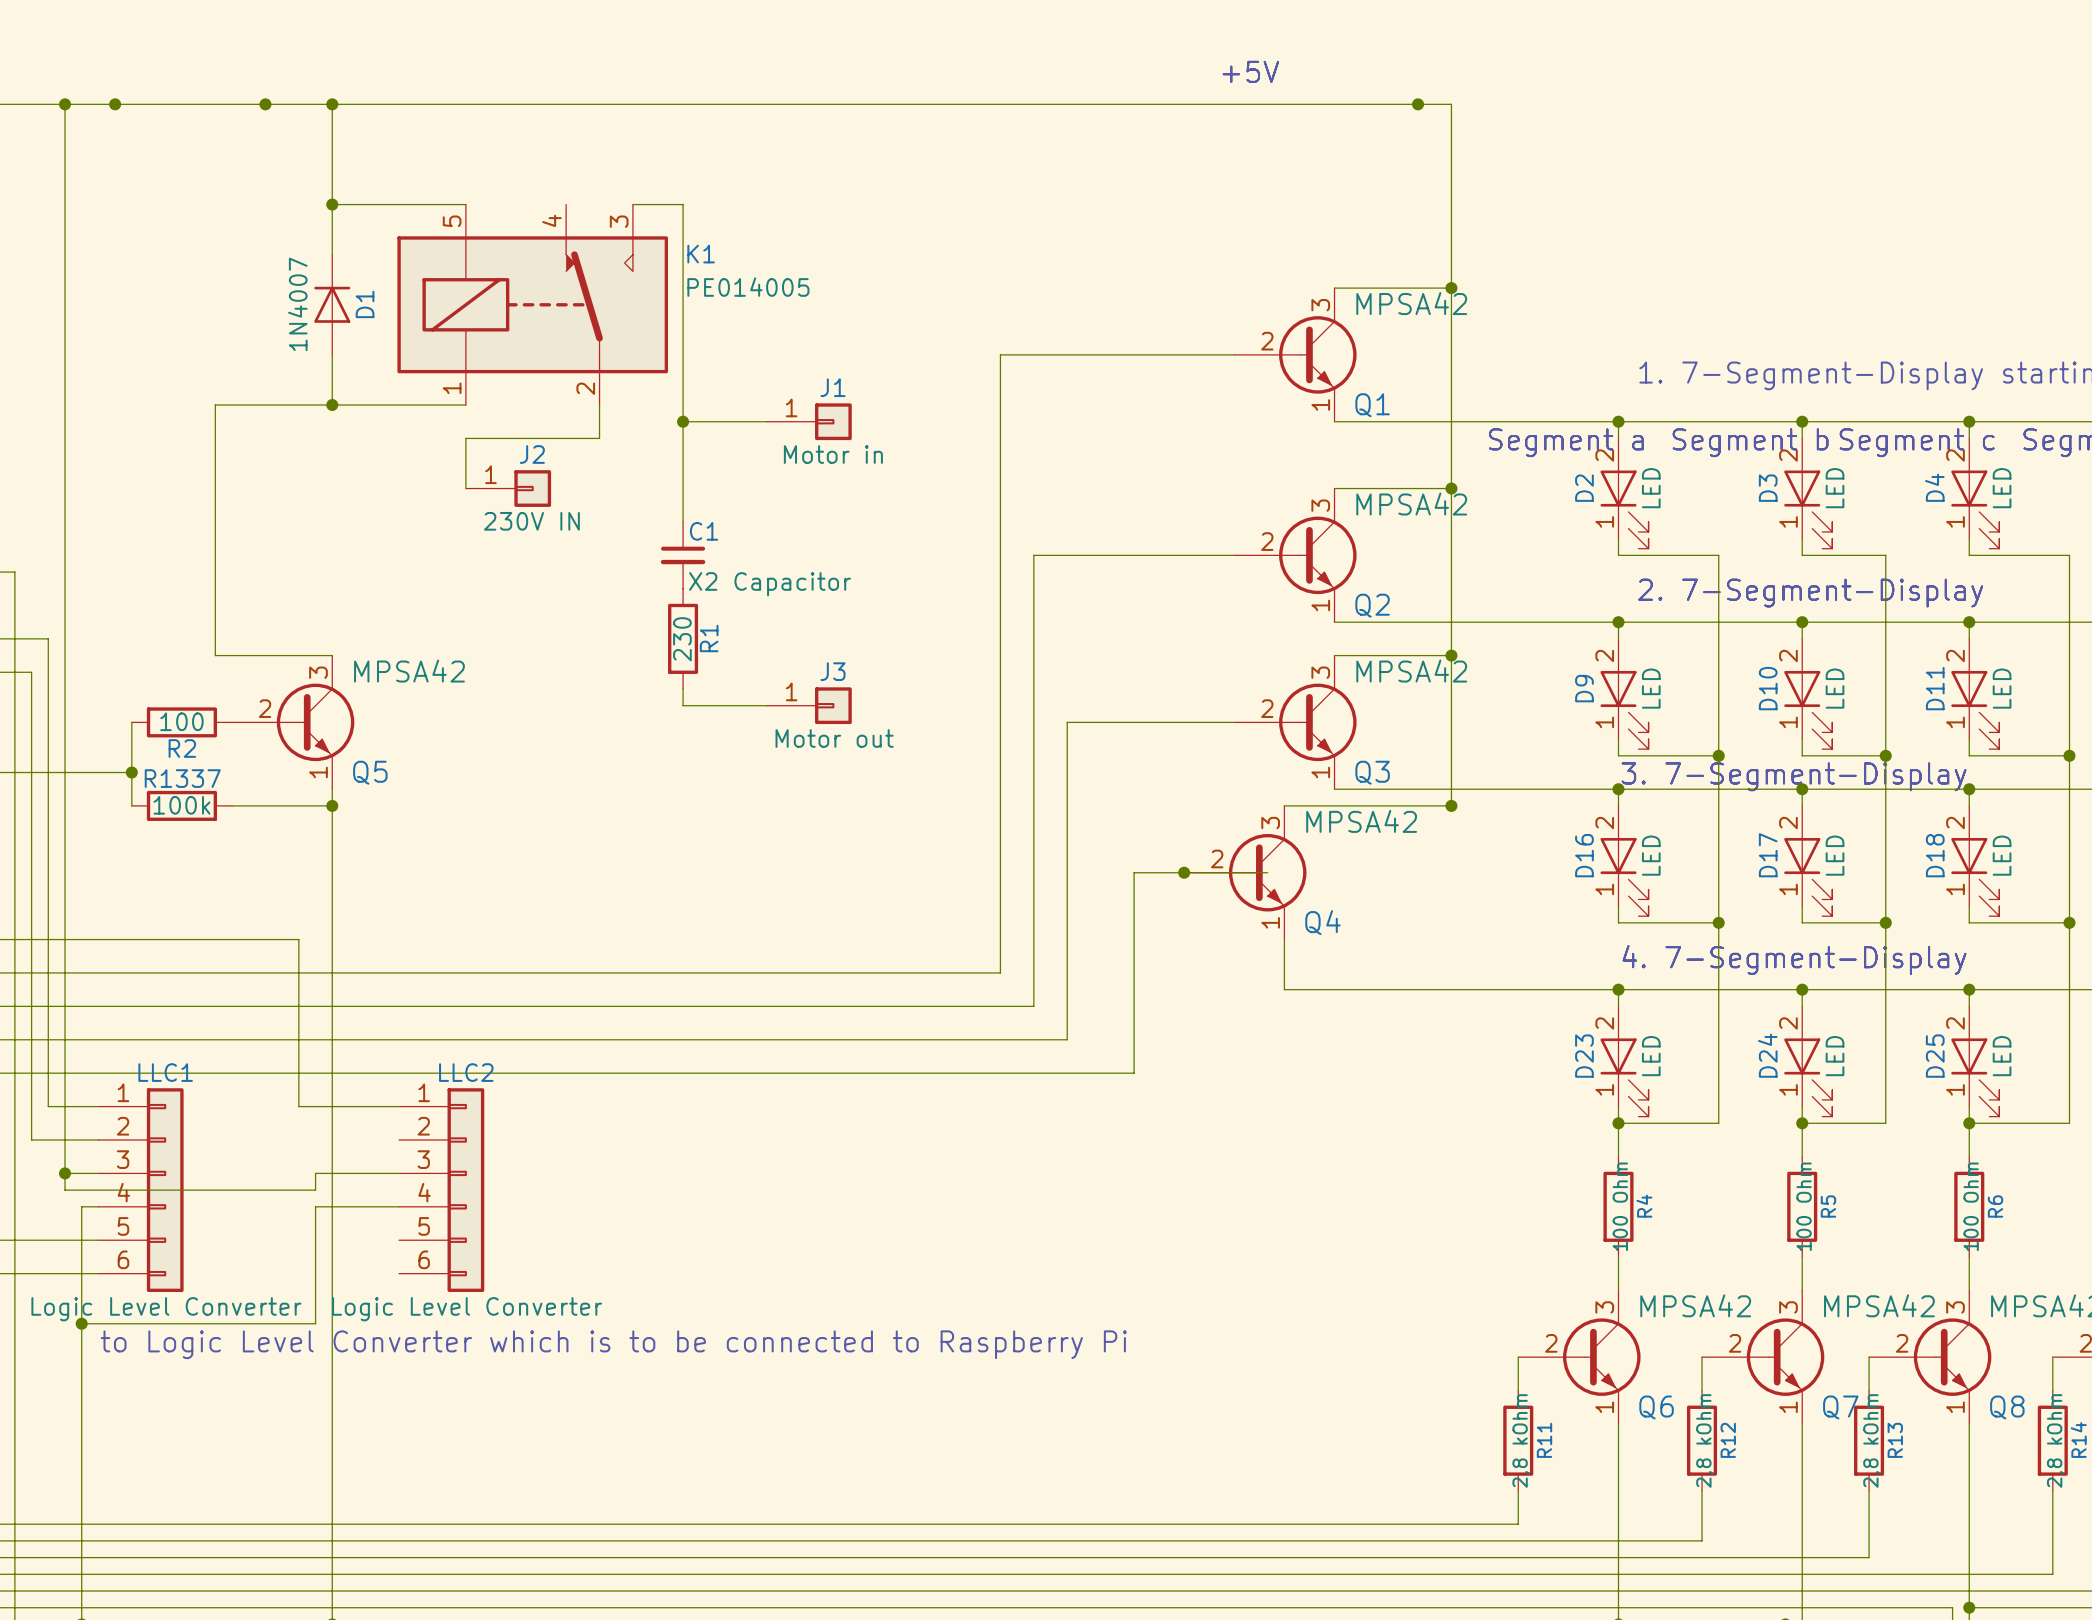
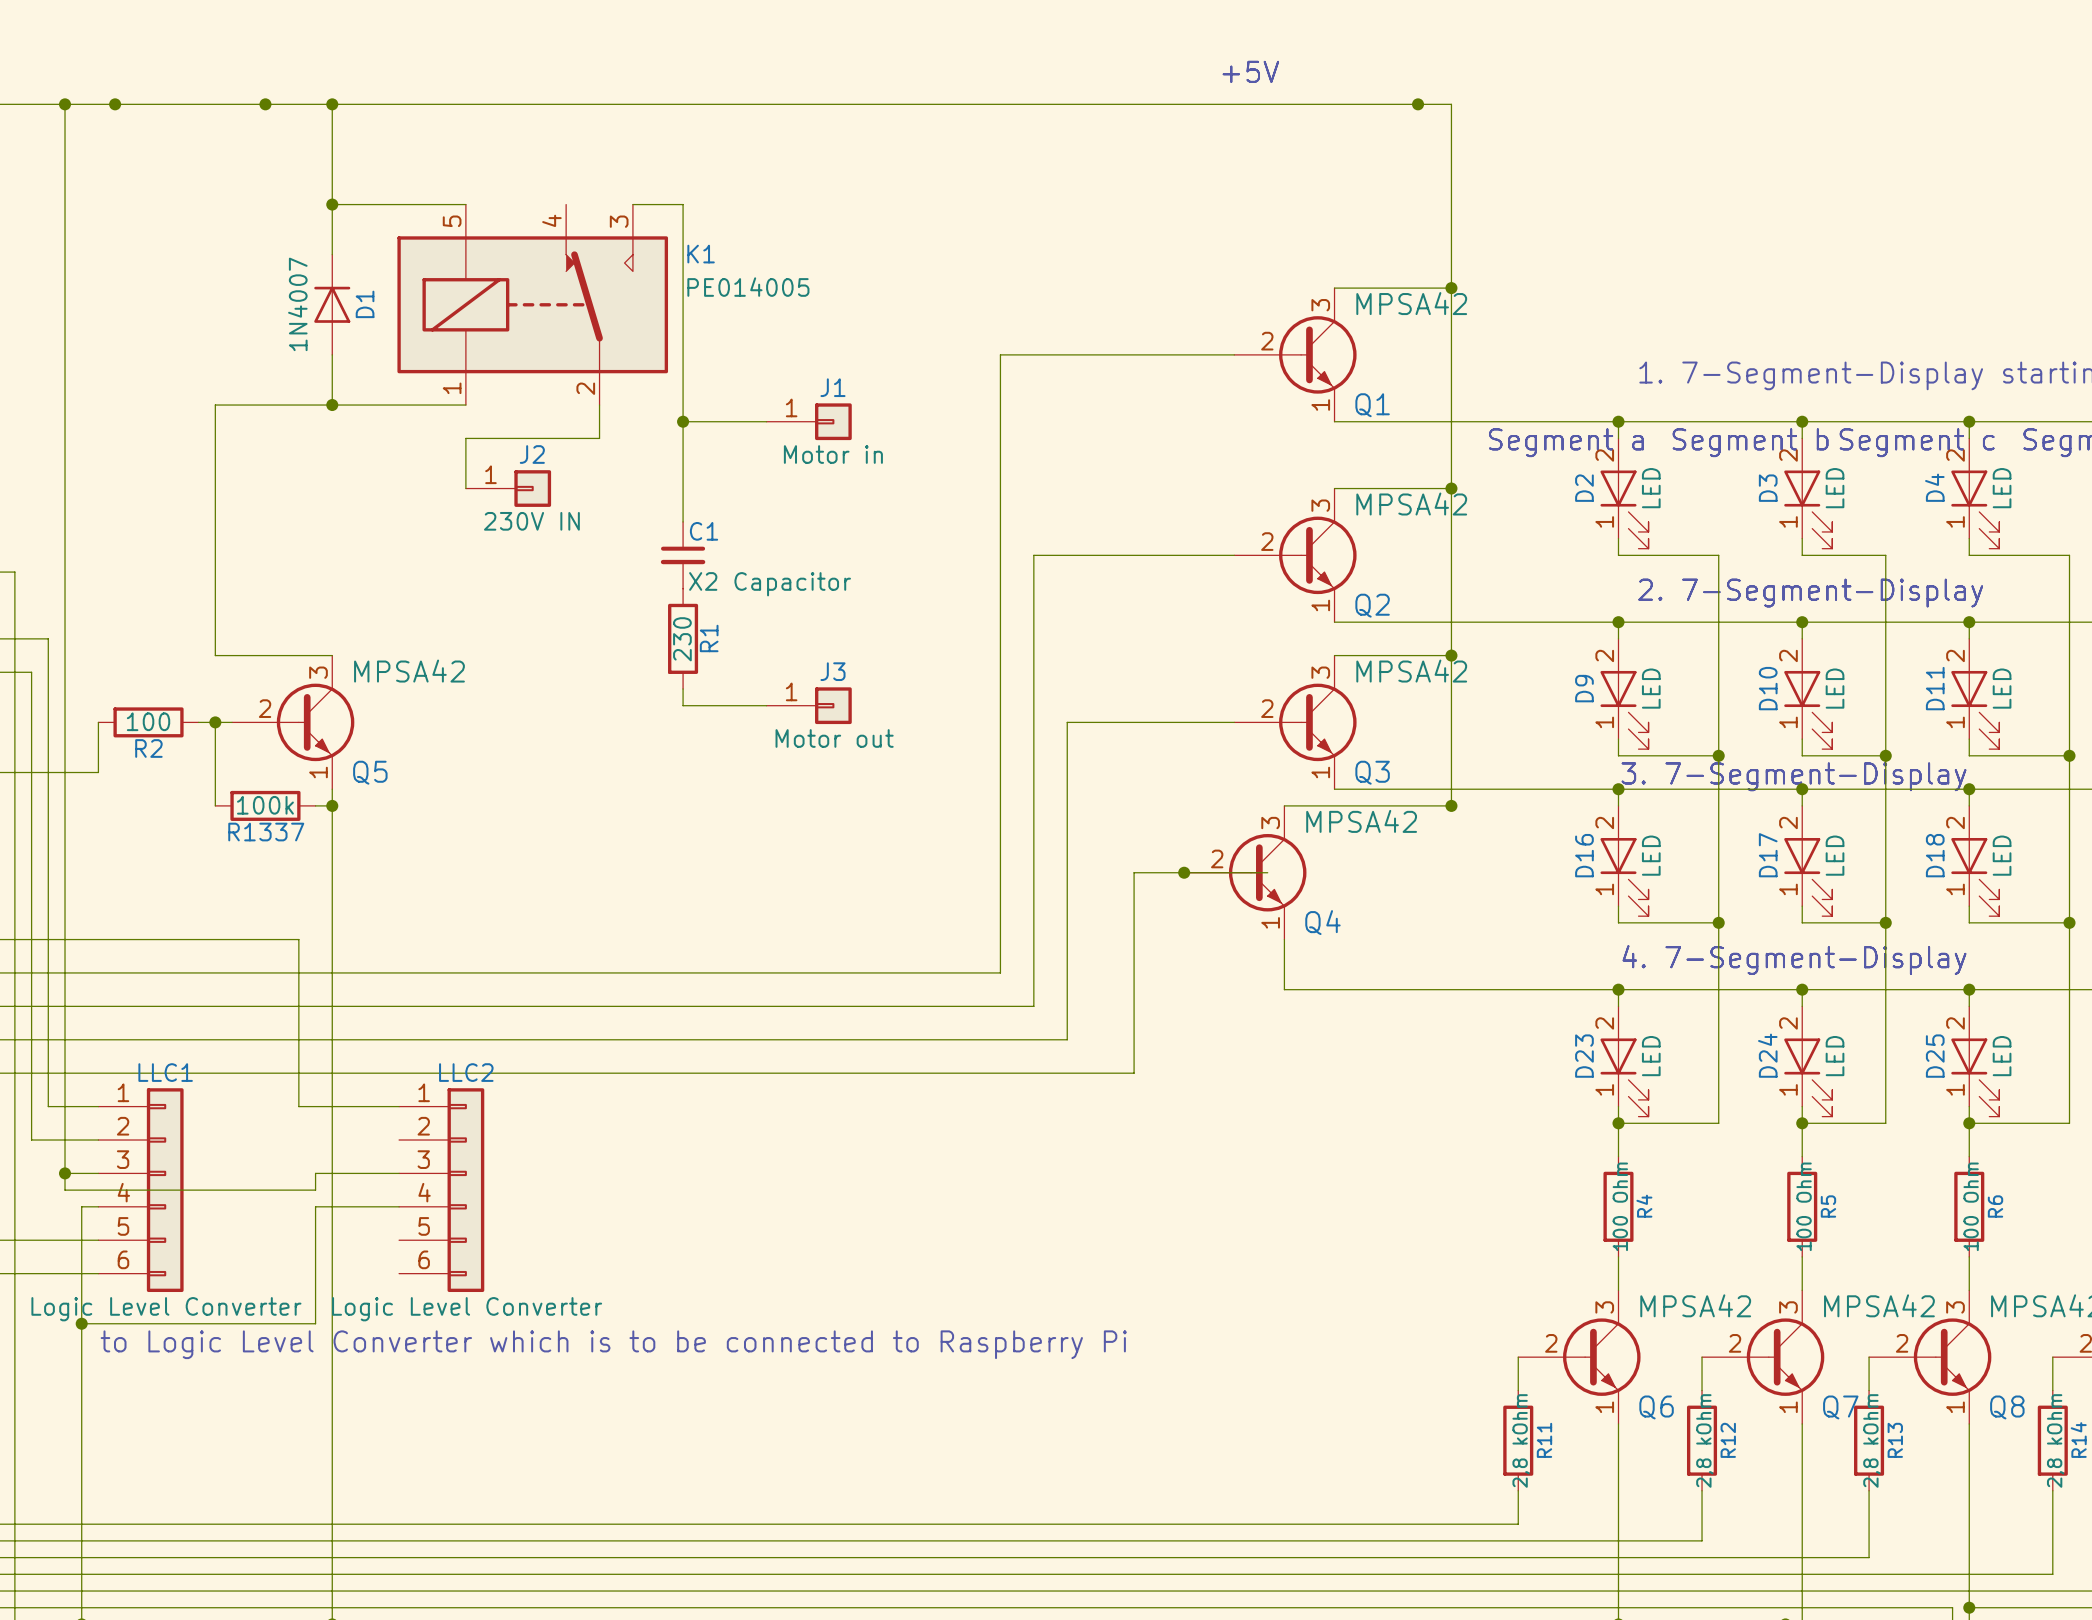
wire: (131, 722) (131, 805) -> (215, 722) (215, 805)
R2 position: (181, 722) -> (148, 722)
junction: none -> (215, 722)
wire: (98, 772) (131, 772) -> (98, 772) (98, 722)
junction: (131, 772) -> none
R1337 name position: R1337 (182, 778) -> R1337 (266, 832)
R1337 position: (181, 805) -> (265, 805)
wire: (232, 805) (315, 805) -> none

